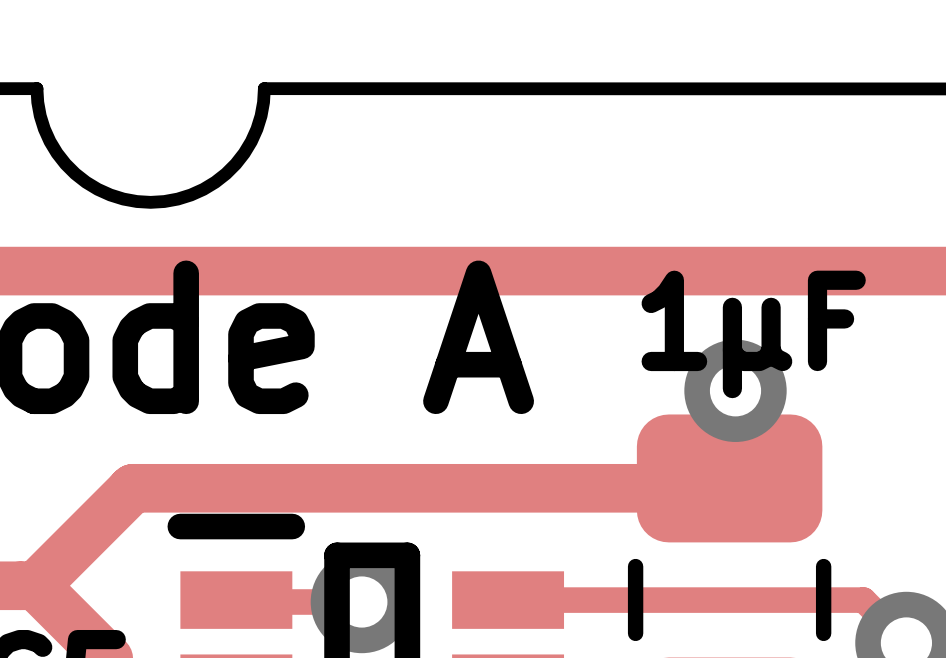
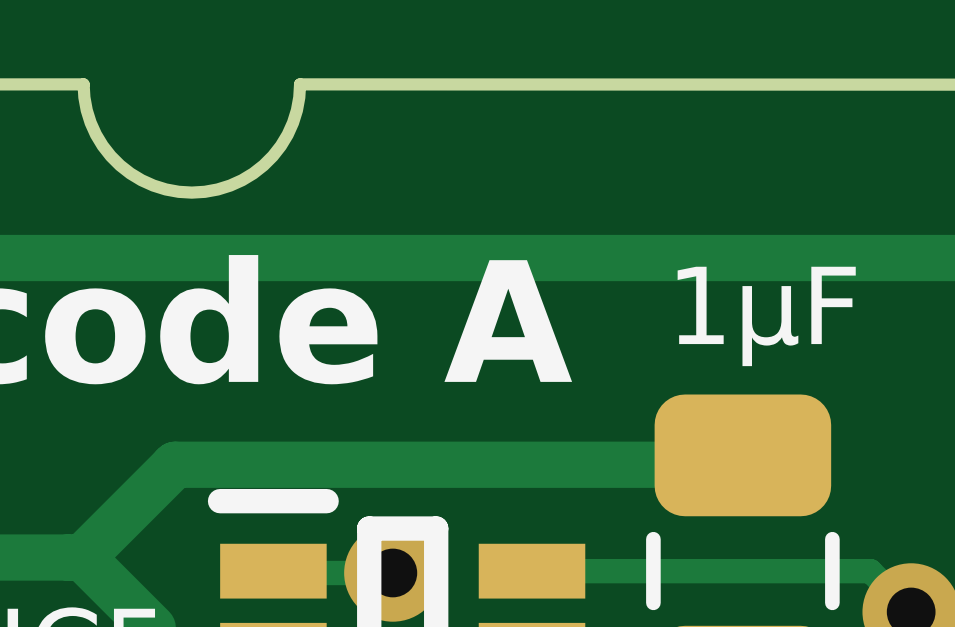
via: (735, 390) -> none

